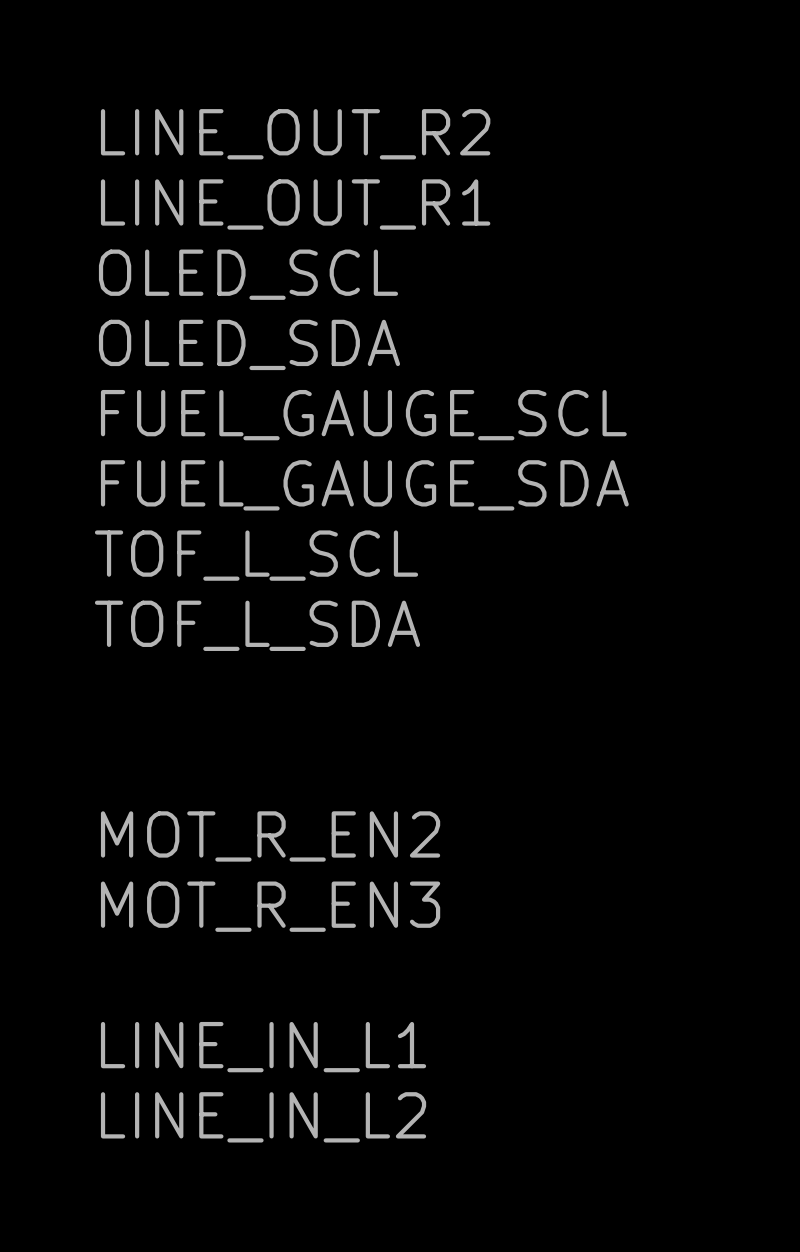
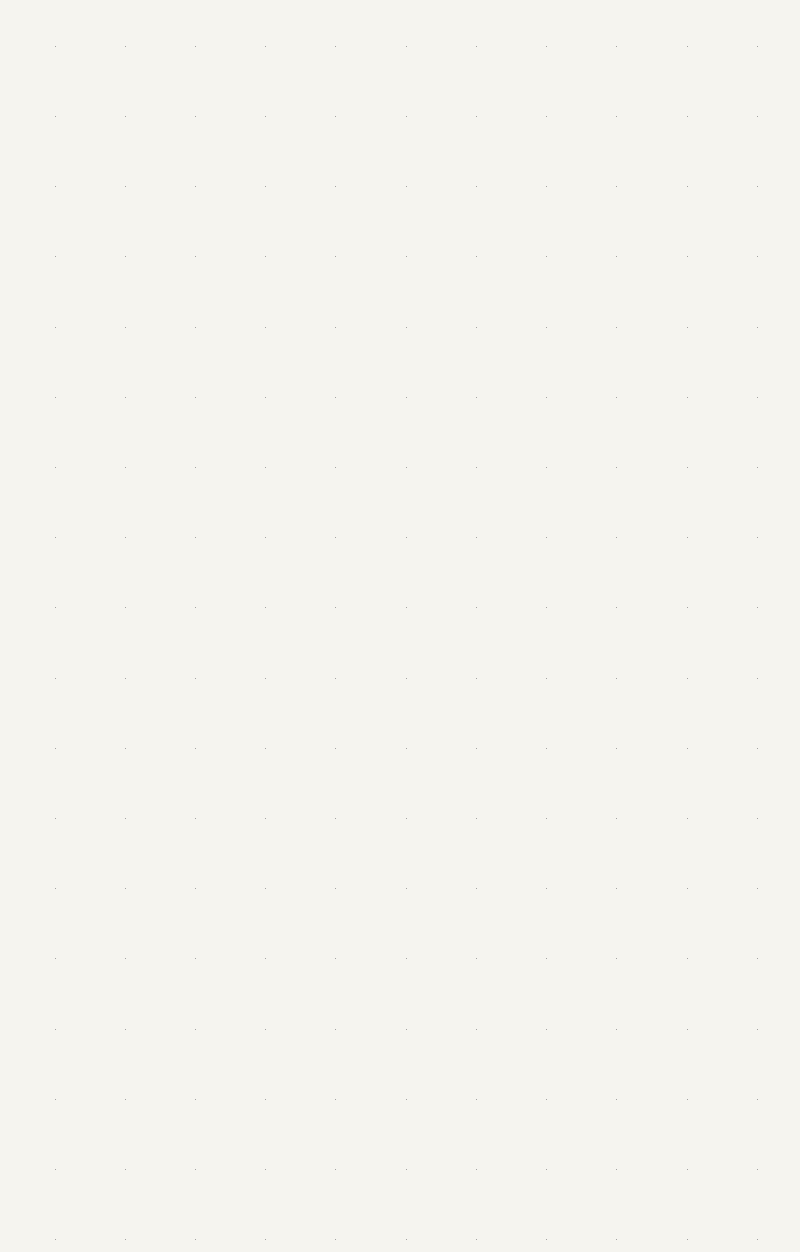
label: LINE_OUT_R2 (295, 134) -> none
label: LINE_OUT_R1 (295, 204) -> none
label: OLED_SCL (248, 274) -> none
label: OLED_SDA (249, 344) -> none
label: FUEL_GAUGE_SCL (363, 415) -> none
label: FUEL_GAUGE_SDA (364, 485) -> none
label: TOF_L_SCL (256, 555) -> none
label: TOF_L_SDA (257, 625) -> none
label: MOT_R_EN2 (270, 836) -> none
label: MOT_R_EN3 (270, 906) -> none
label: LINE_IN_L1 (263, 1047) -> none
label: LINE_IN_L2 (263, 1117) -> none

